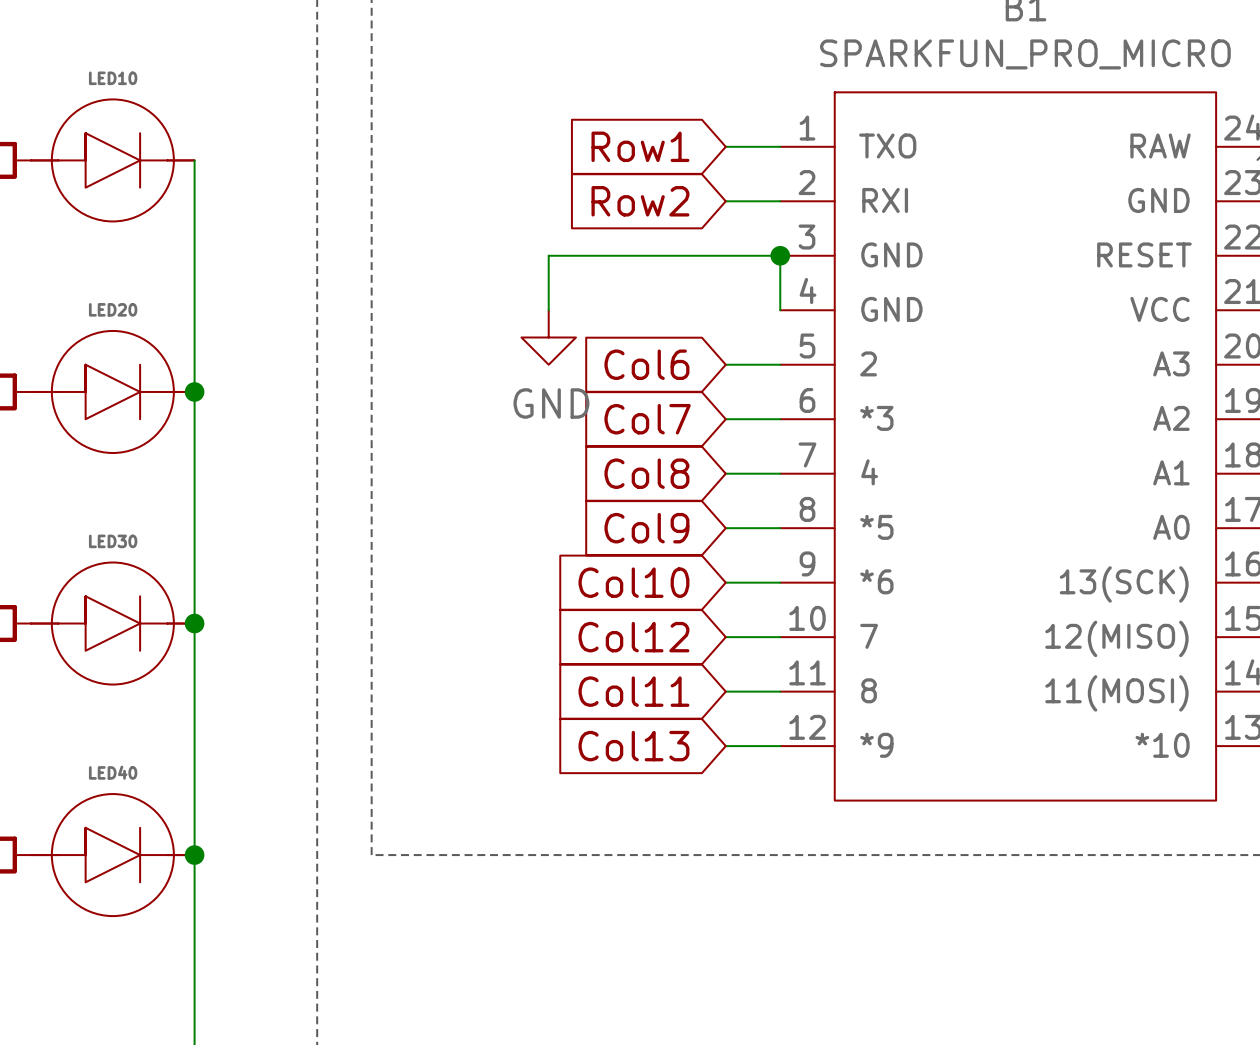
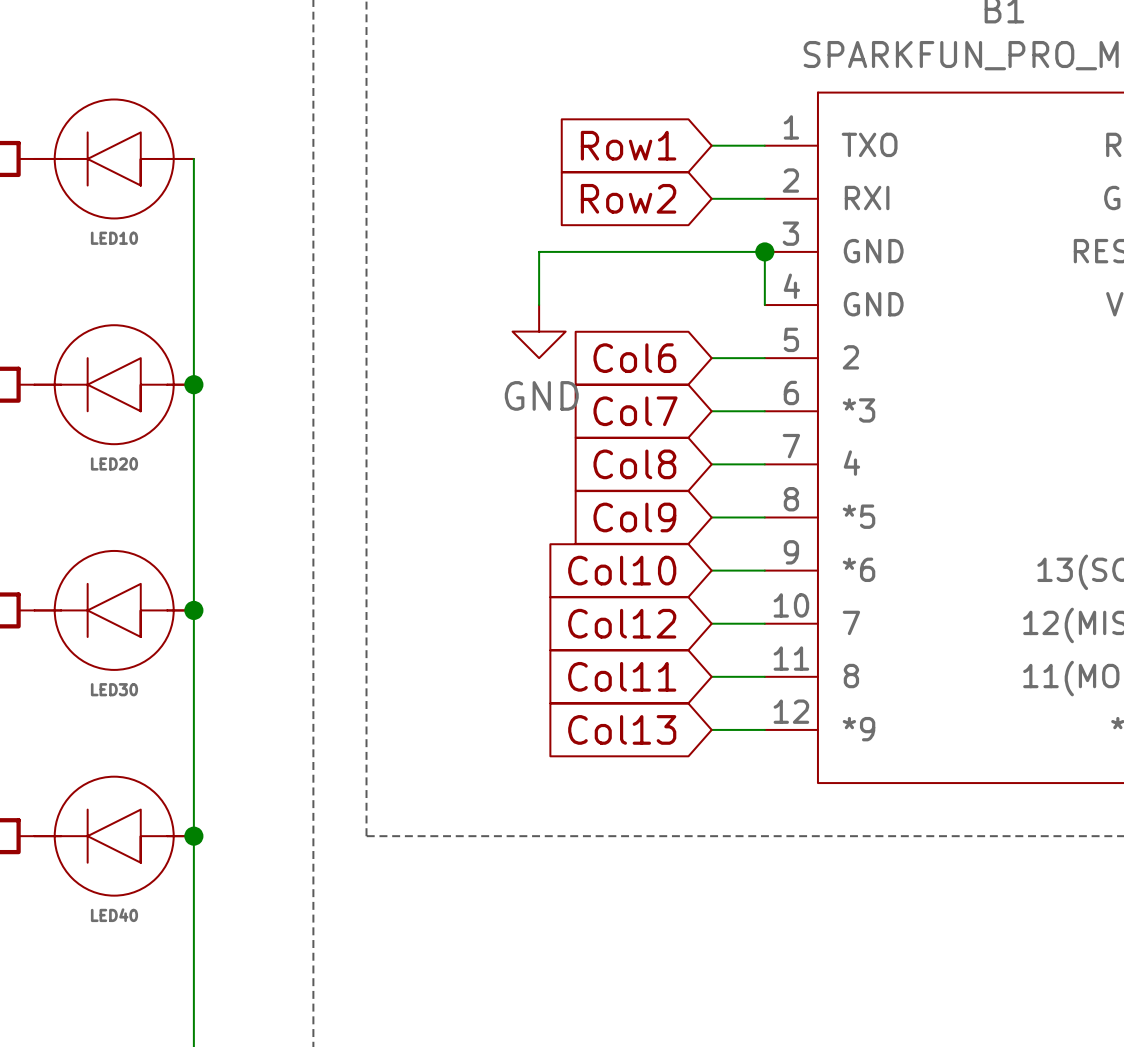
LED10 rotation: 0° (112, 160) -> 180° (114, 158)
LED20 rotation: 0° (112, 391) -> 180° (114, 384)
LED30 rotation: 0° (112, 623) -> 180° (114, 610)
LED40 rotation: 0° (112, 855) -> 180° (114, 836)

